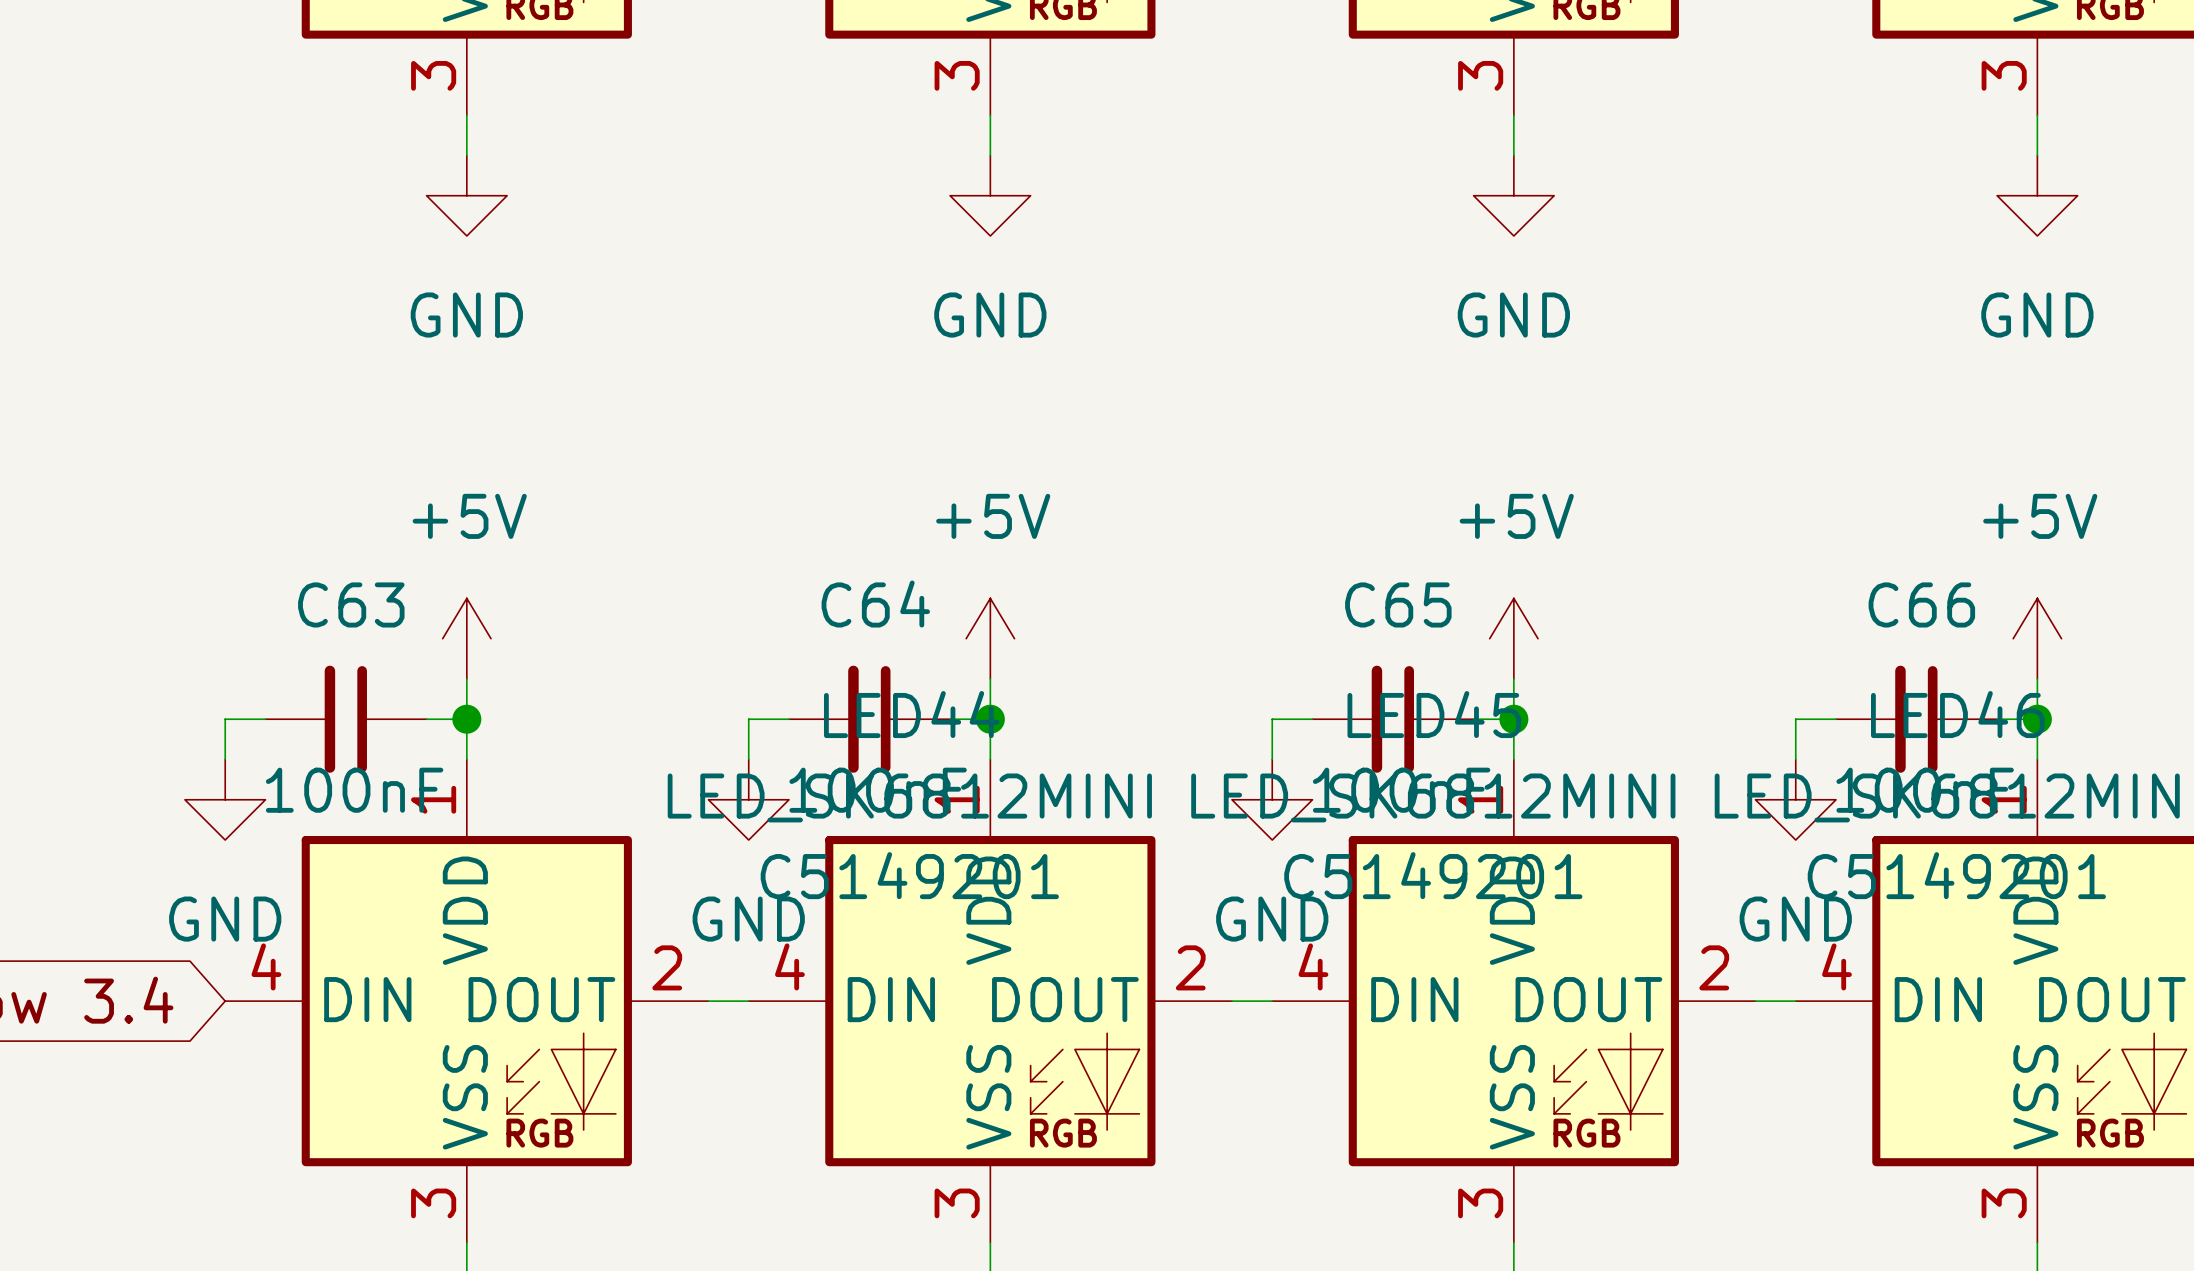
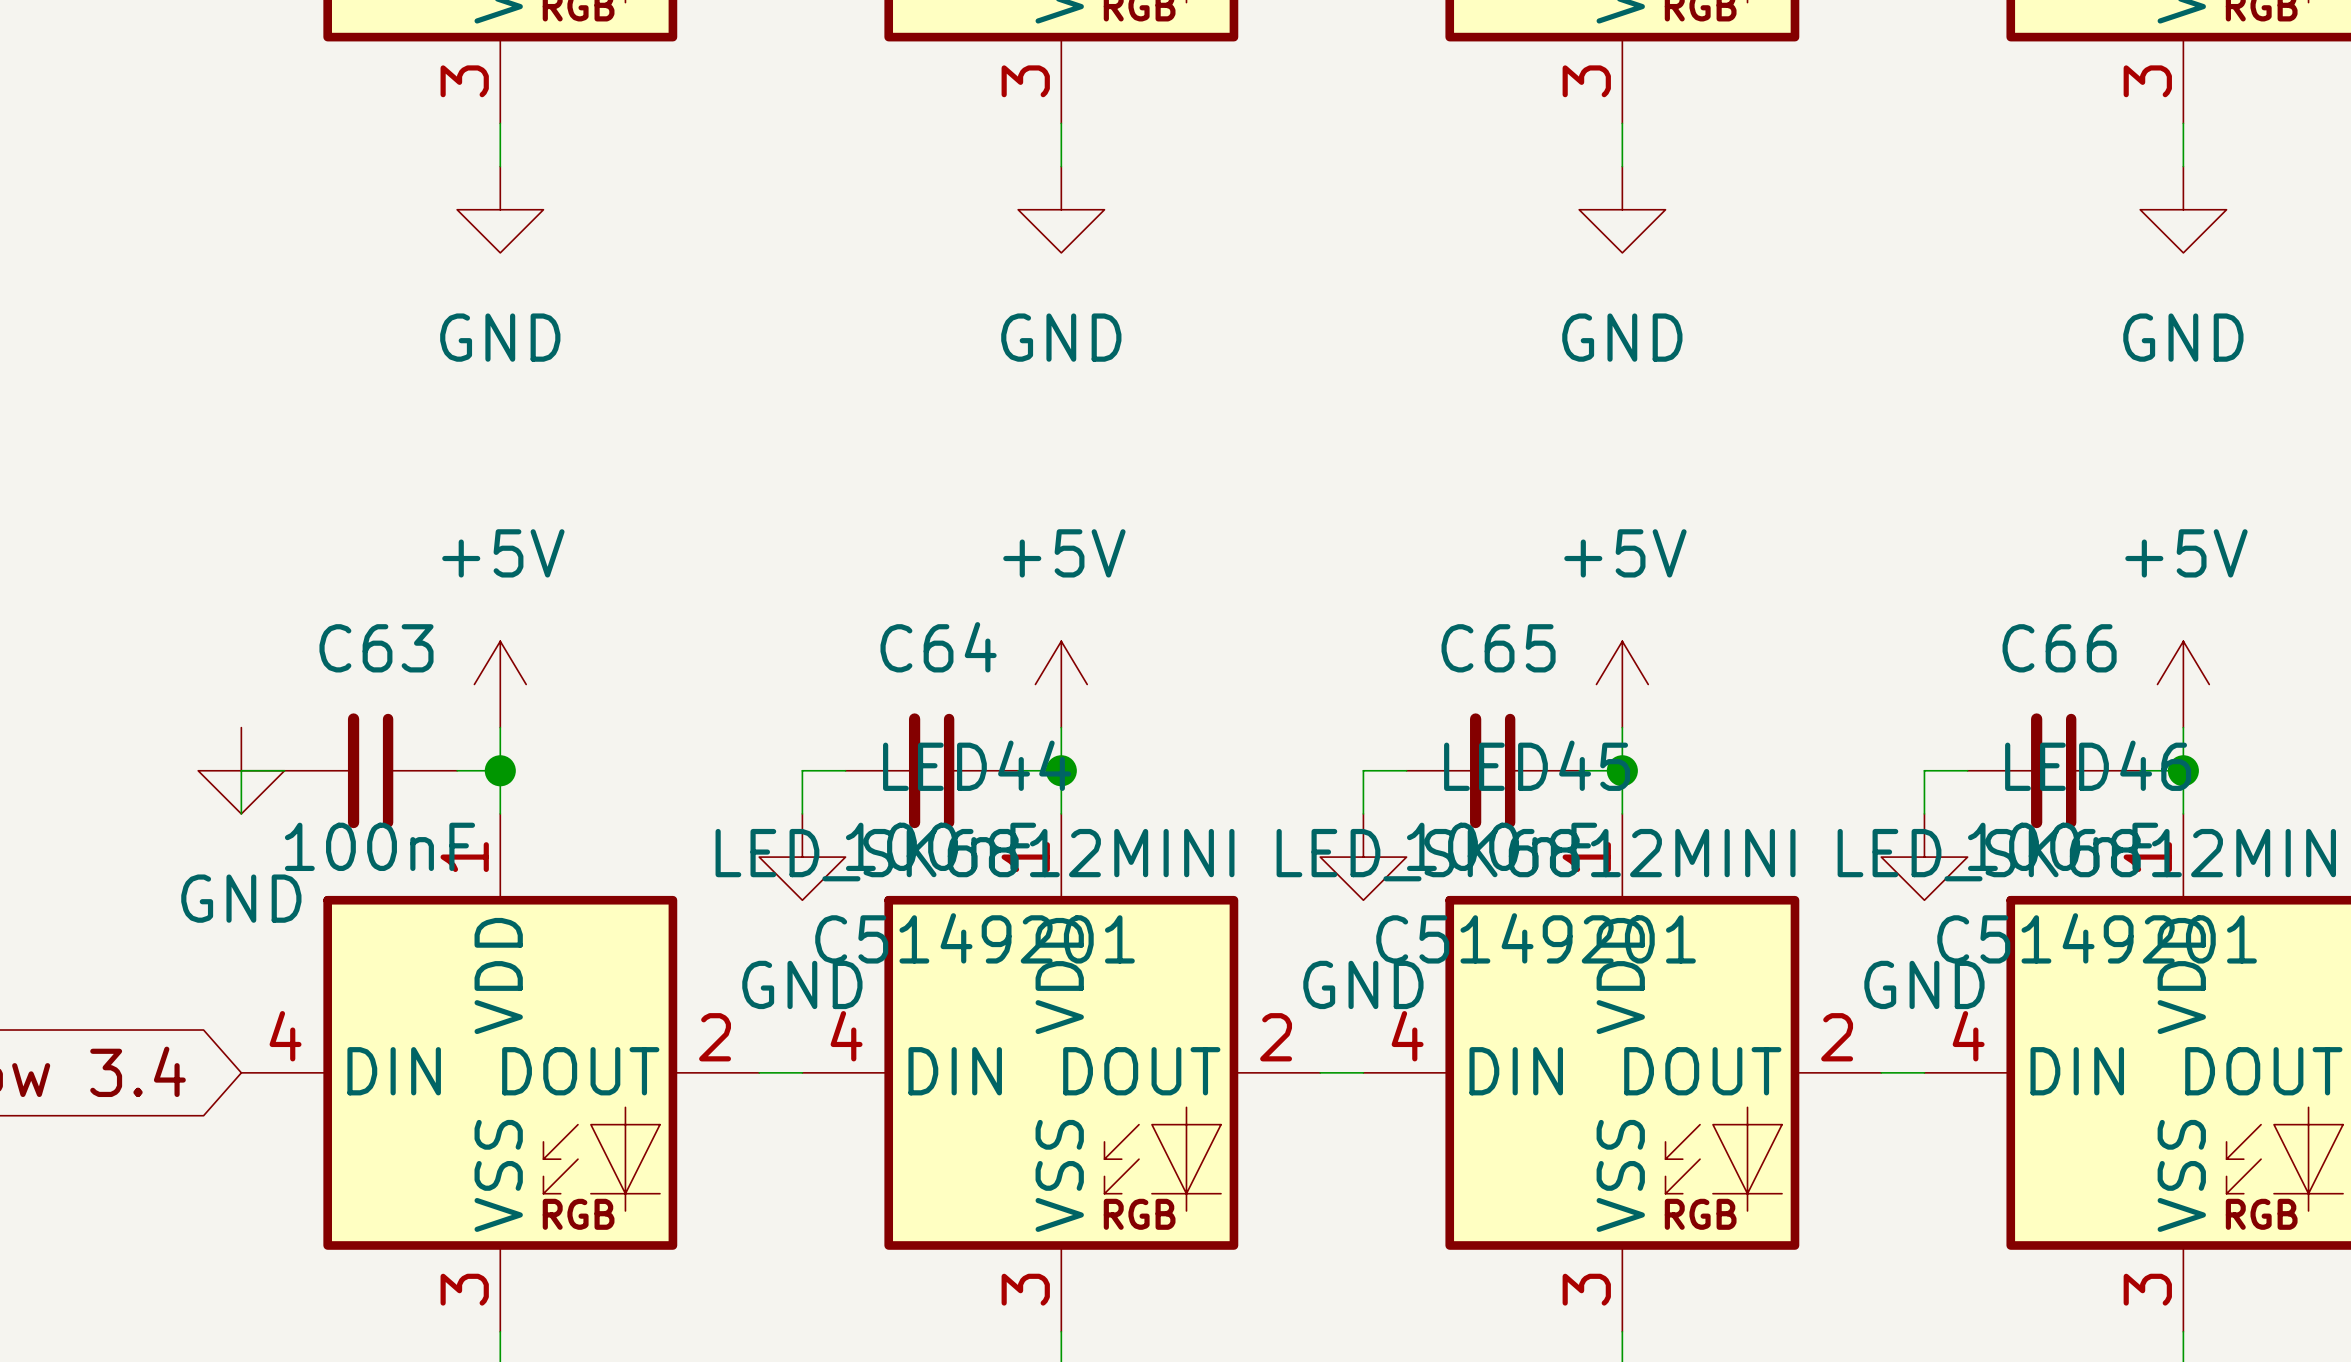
power symbol position: GND (225, 799) -> GND (241, 770)

